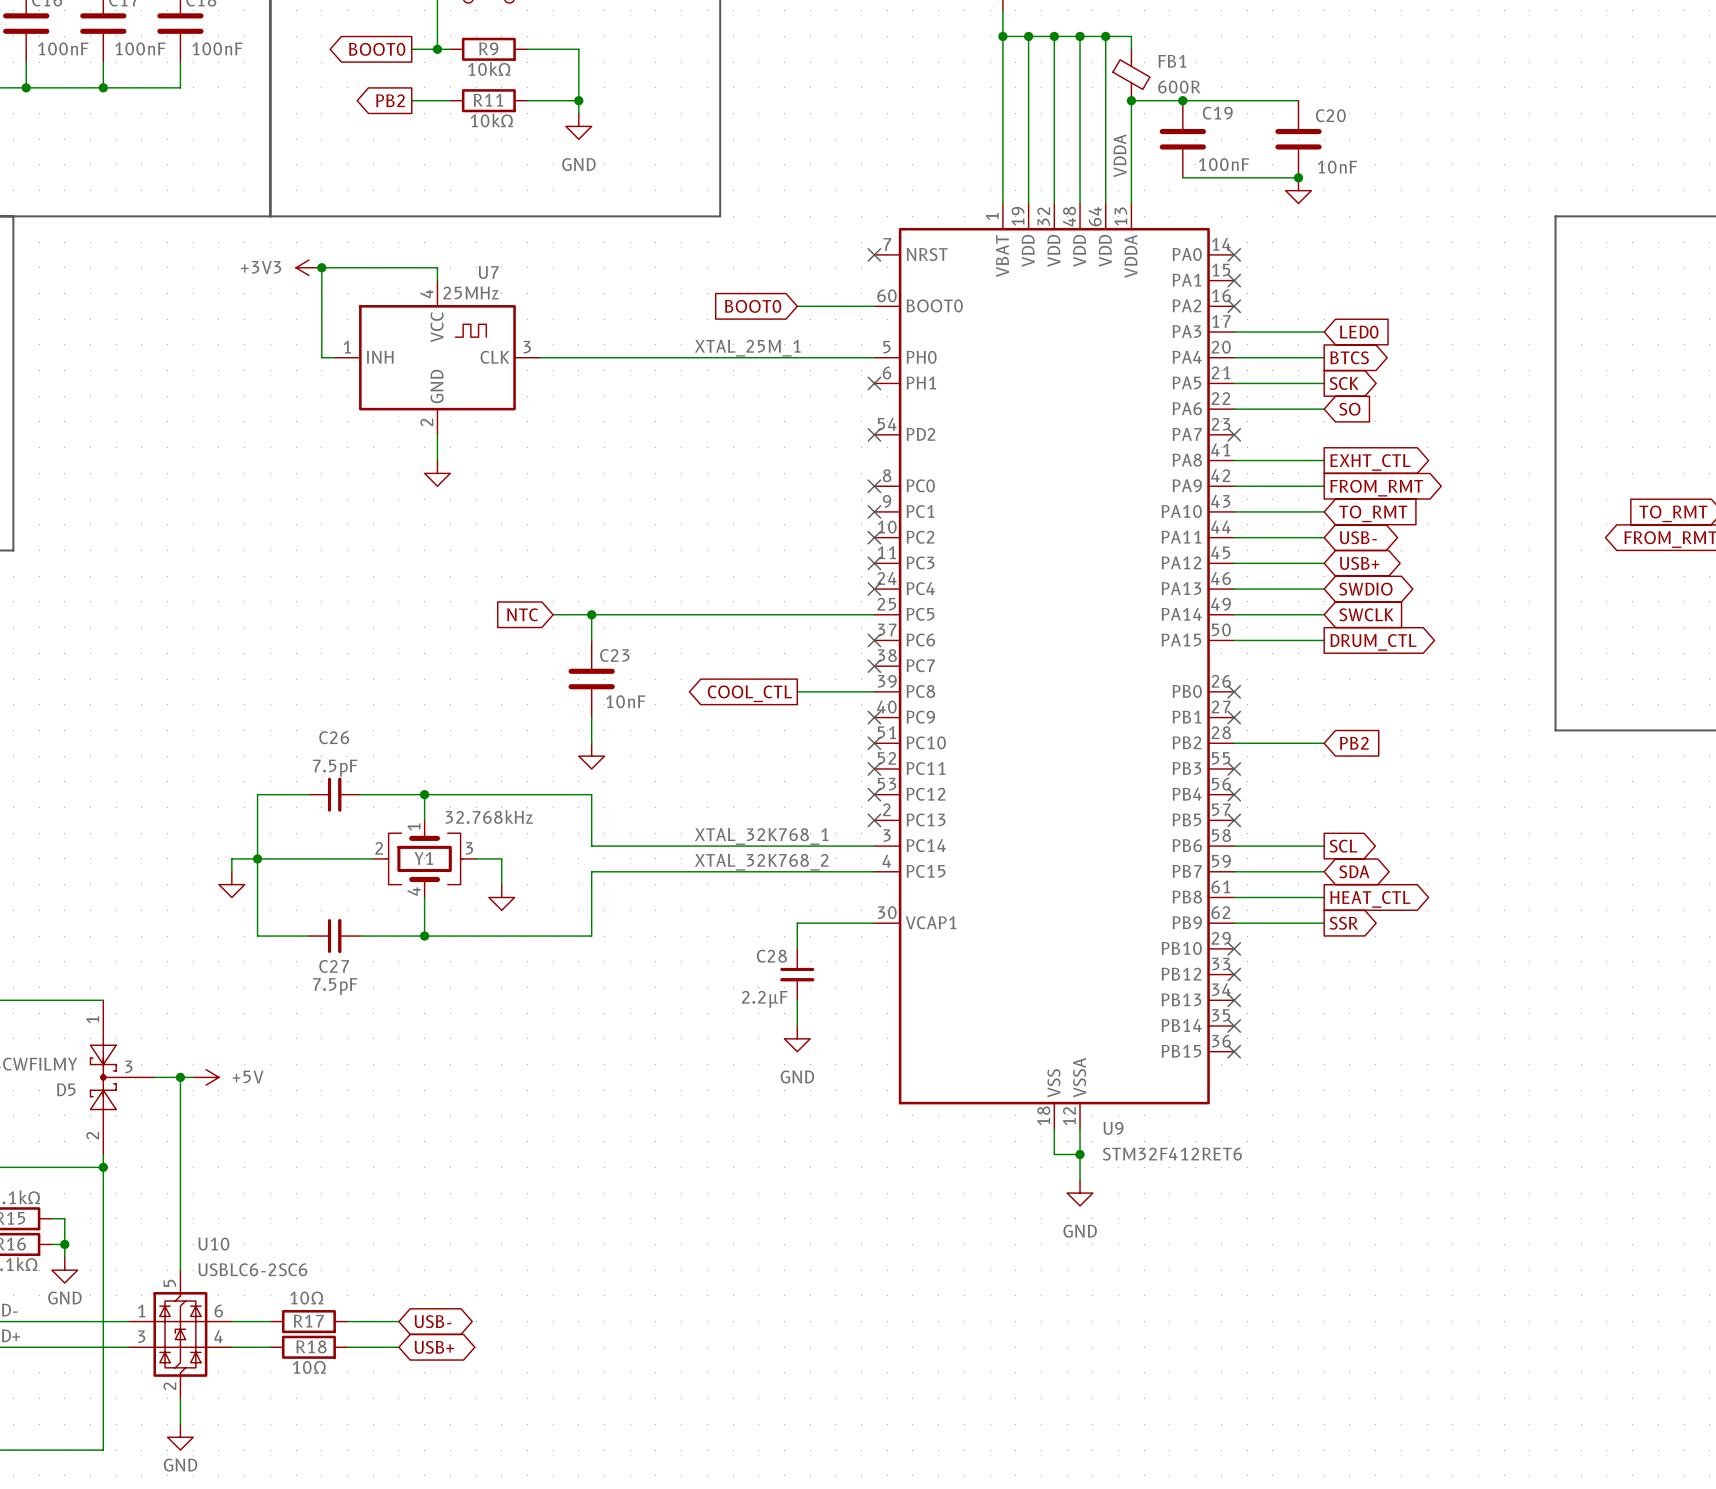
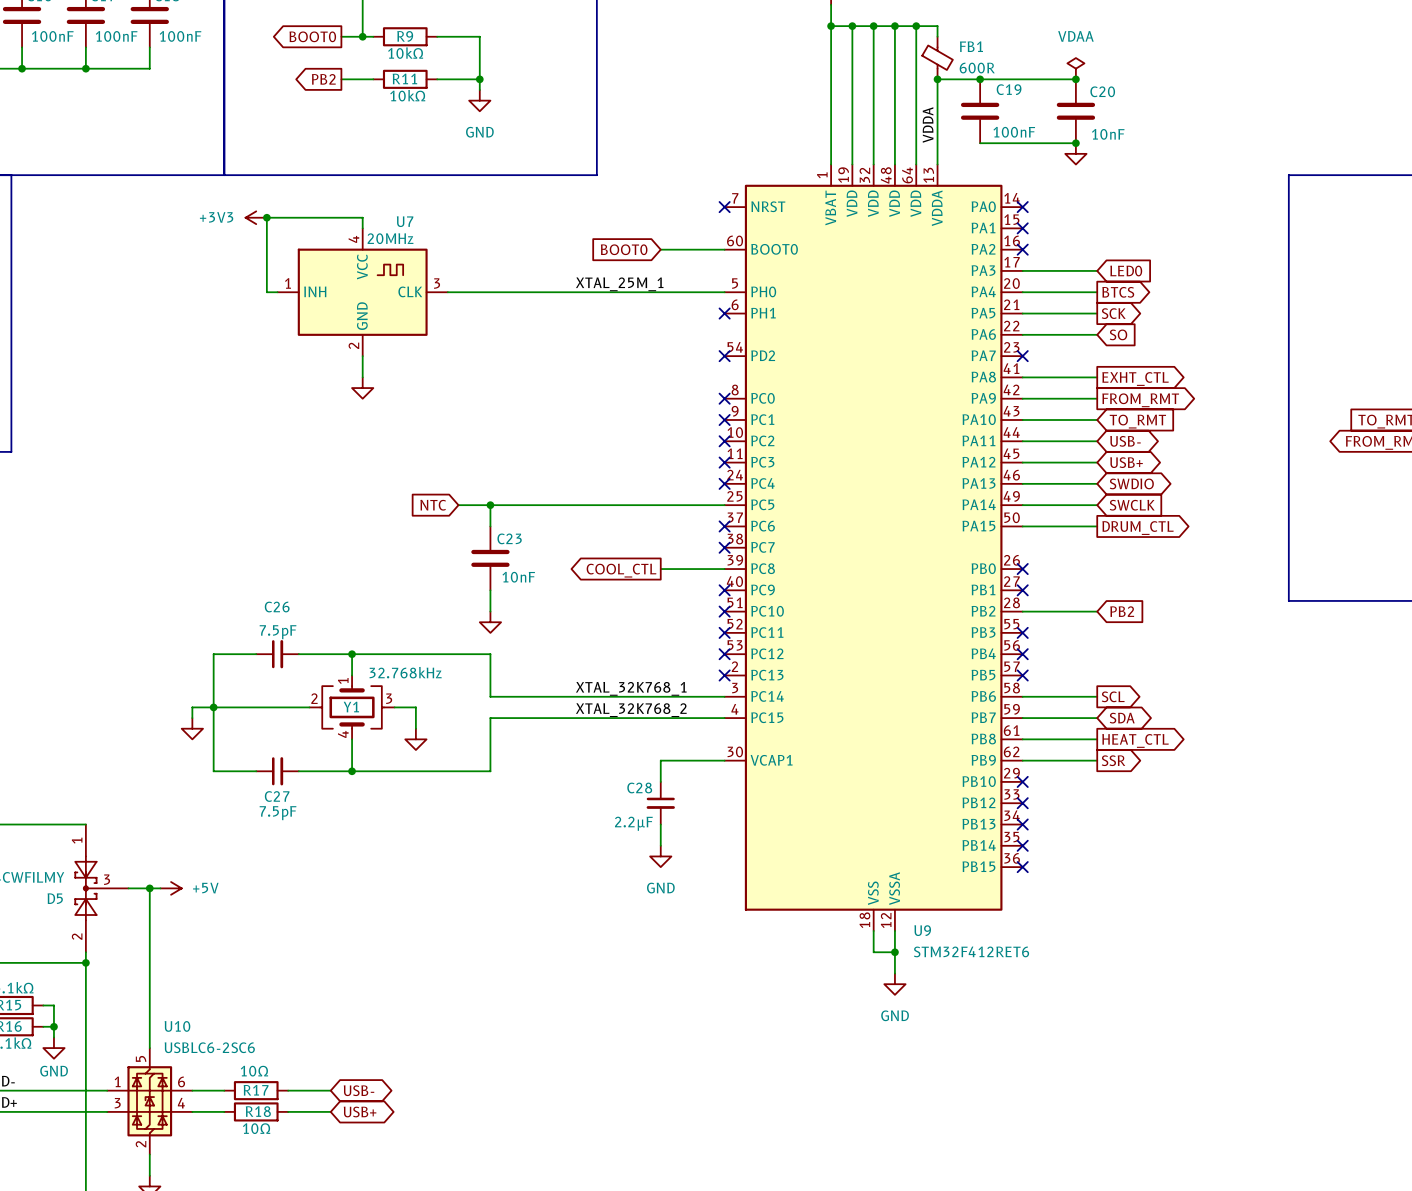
power symbol: none -> VDAA (1075, 68)
junction: none -> (1075, 79)
U7 value: 25MHz (471, 292) -> 20MHz (390, 238)

